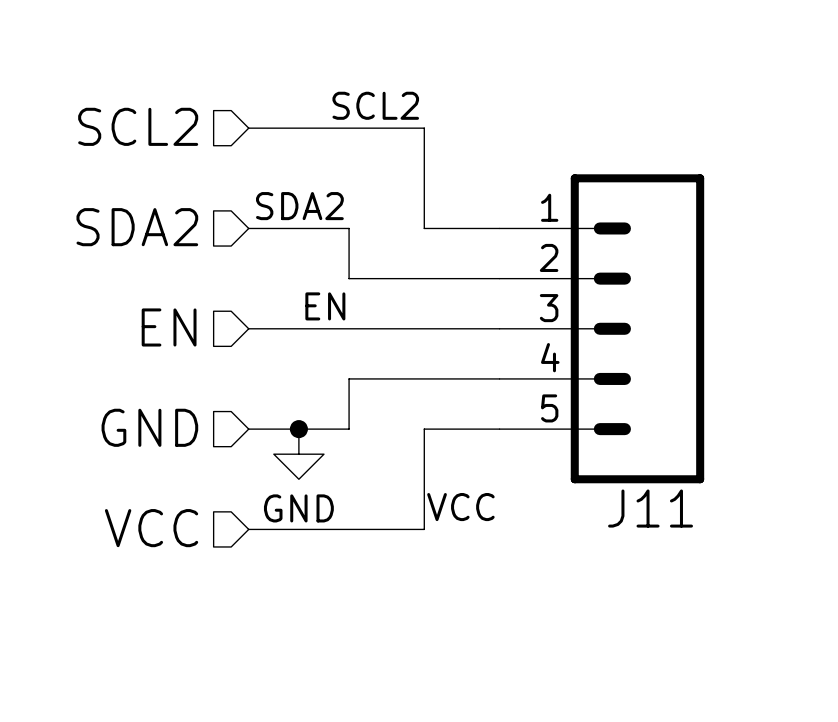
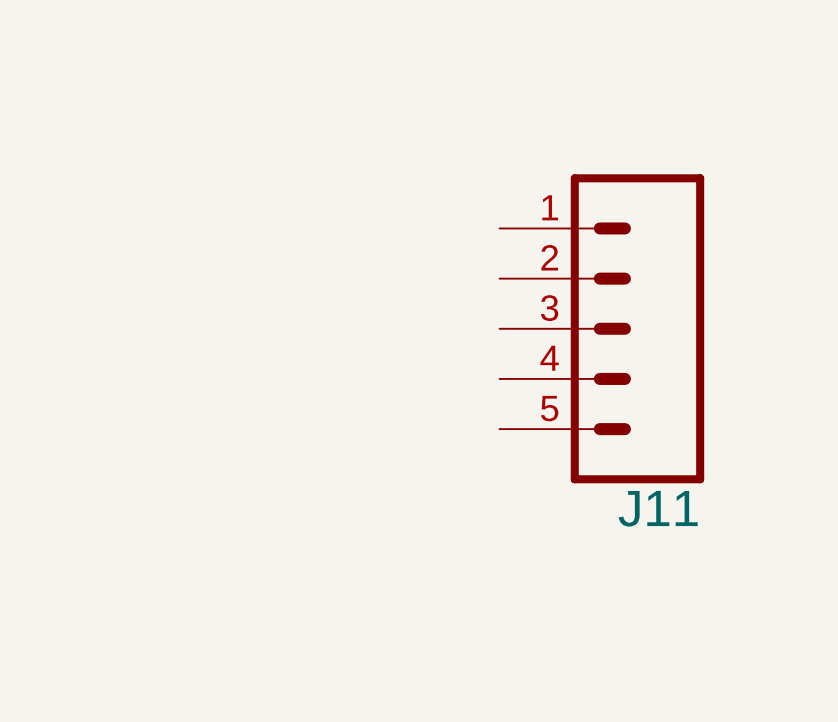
label: SCL2 (375, 105) -> none
hierarchical label: SCL2 (138, 126) -> none
wire: (248, 128) (424, 128) (424, 228) (499, 228) -> none
label: SDA2 (299, 206) -> none
hierarchical label: SDA2 (137, 227) -> none
wire: (248, 228) (349, 228) (349, 278) (499, 278) -> none
label: EN (325, 306) -> none
hierarchical label: EN (169, 327) -> none
wire: (248, 328) (499, 328) -> none
wire: (499, 378) (349, 378) (349, 429) (248, 429) -> none
hierarchical label: GND (149, 427) -> none
junction: (298, 429) -> none
wire: (499, 429) (424, 429) (424, 529) (248, 529) -> none
power symbol: GND (298, 454) -> none
label: VCC (460, 507) -> none
hierarchical label: VCC (151, 528) -> none

